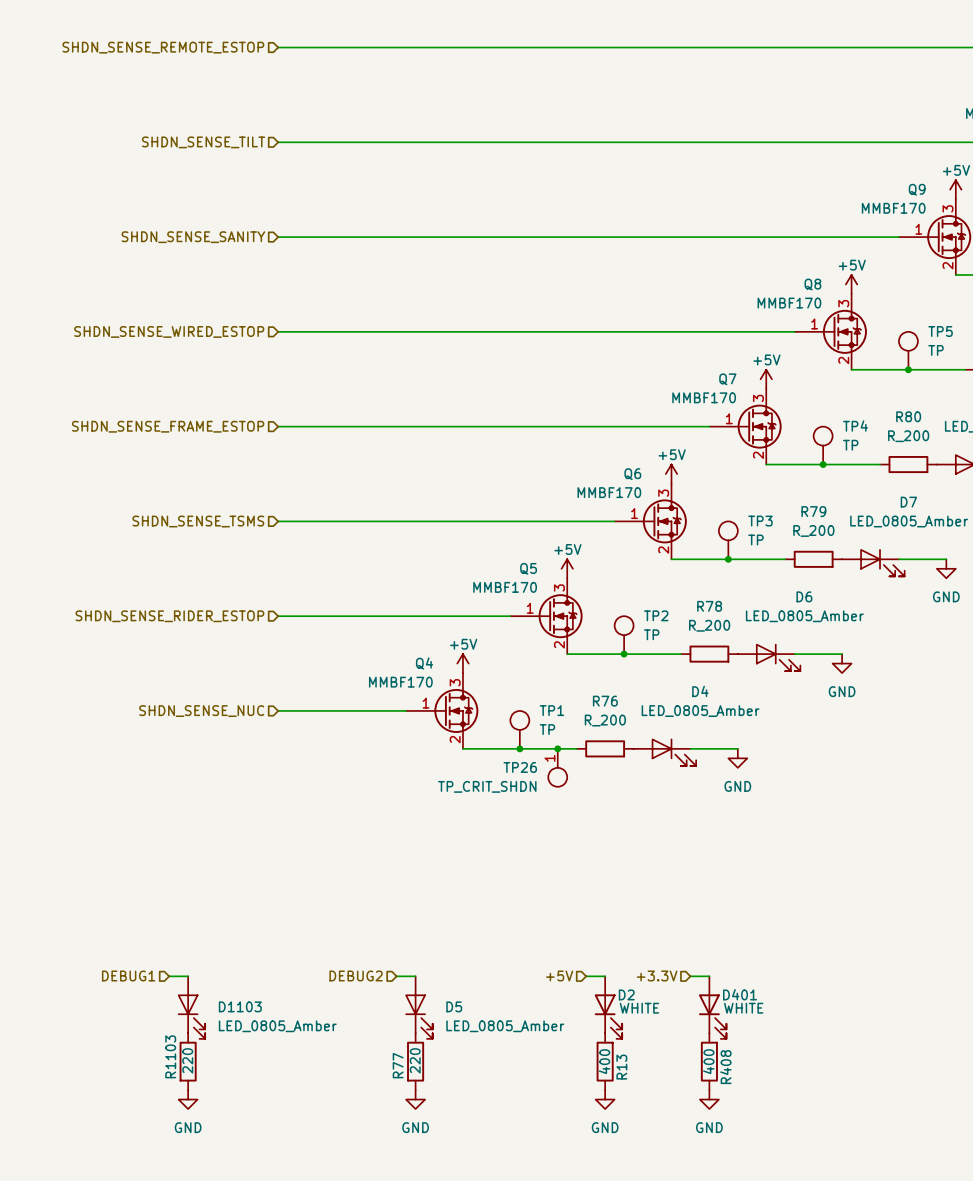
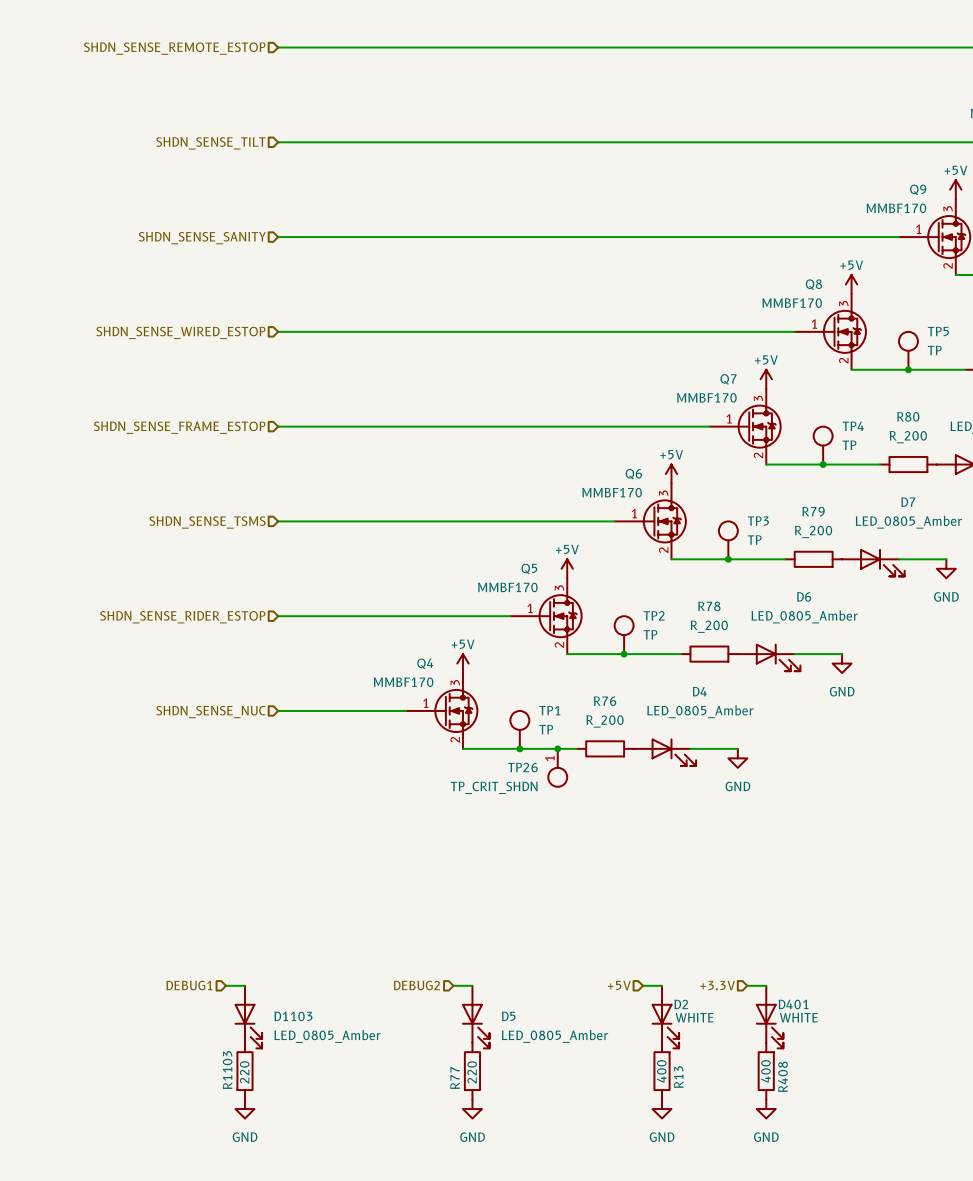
hierarchical label position: DEBUG1 (128, 975) -> DEBUG1 (189, 985)
hierarchical label position: DEBUG2 (356, 975) -> DEBUG2 (416, 985)
hierarchical label position: +5V (559, 975) -> +5V (619, 985)
hierarchical label position: +3.3V (657, 975) -> +3.3V (717, 985)
wire: (169, 976) (188, 976) -> (226, 985) (244, 985)
wire: (396, 976) (415, 976) -> (453, 985) (472, 985)
wire: (586, 976) (605, 976) -> (643, 985) (662, 985)
wire: (690, 976) (709, 976) -> (747, 985) (766, 985)
D1103 position: (191, 1007) -> (248, 1017)
D5 position: (419, 1007) -> (475, 1017)
D2 position: (608, 1007) -> (665, 1017)
D401 position: (712, 1007) -> (769, 1017)
R1103 position: (188, 1061) -> (244, 1071)
R77 position: (415, 1061) -> (472, 1071)
R13 position: (605, 1061) -> (662, 1071)
R408 position: (709, 1061) -> (766, 1071)
power symbol position: GND (188, 1099) -> GND (244, 1109)
power symbol position: GND (415, 1099) -> GND (472, 1109)
power symbol: GND (605, 1099) -> none
power symbol: GND (709, 1099) -> none
power symbol: none -> GND (662, 1109)
power symbol: none -> GND (766, 1109)

